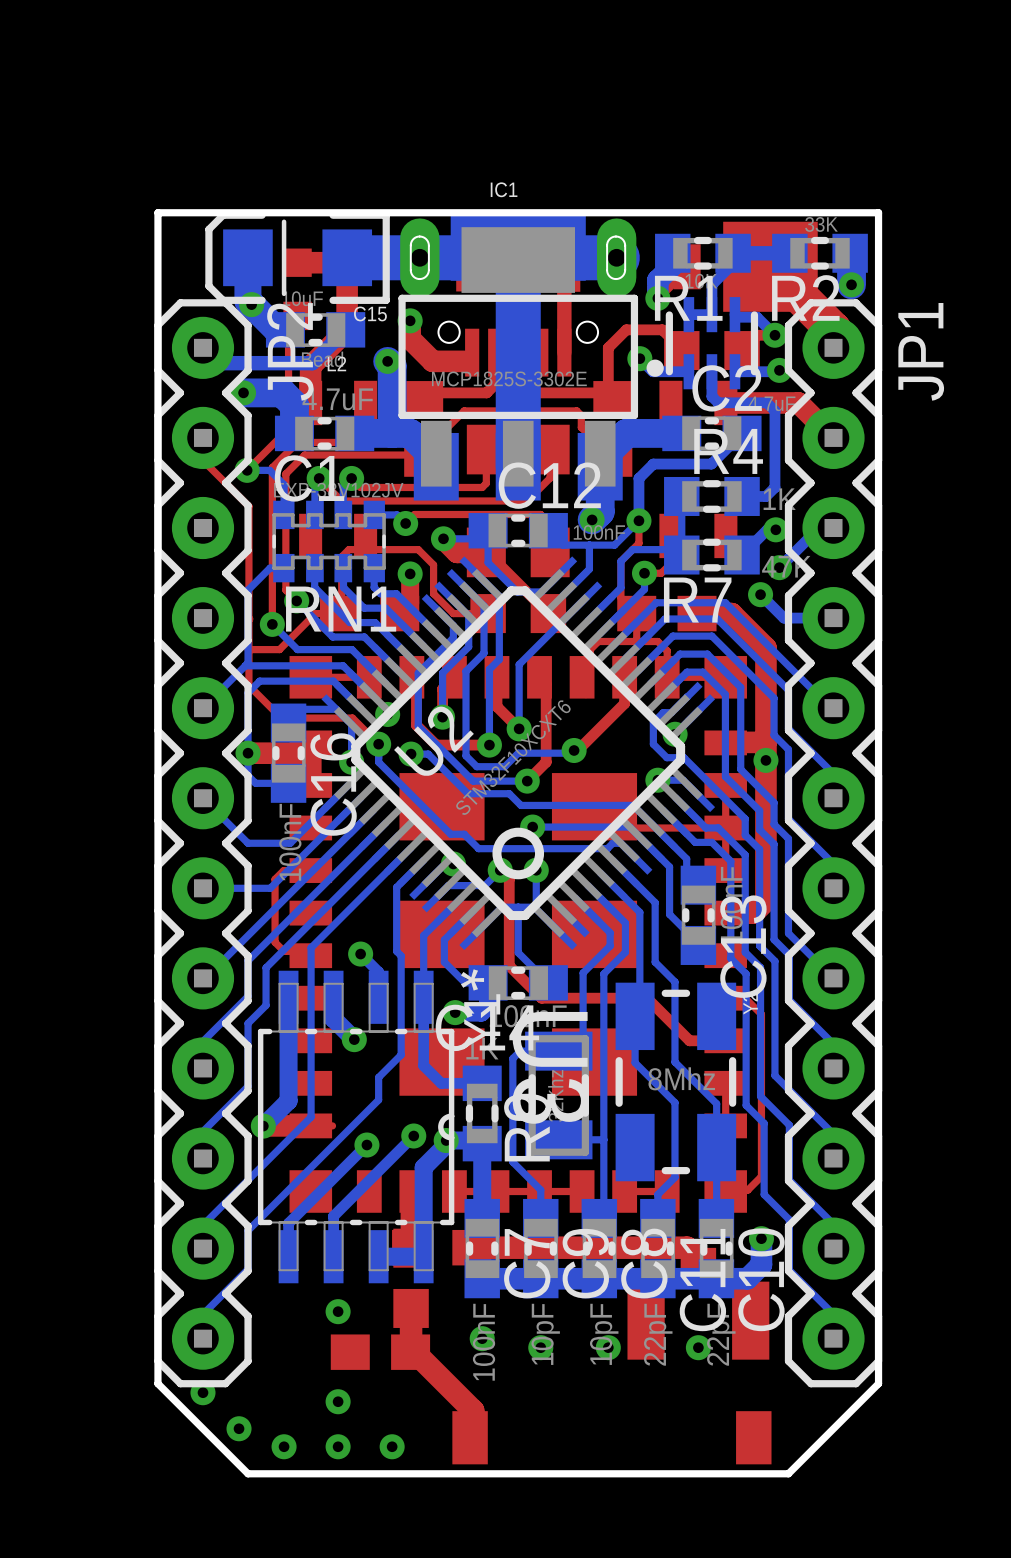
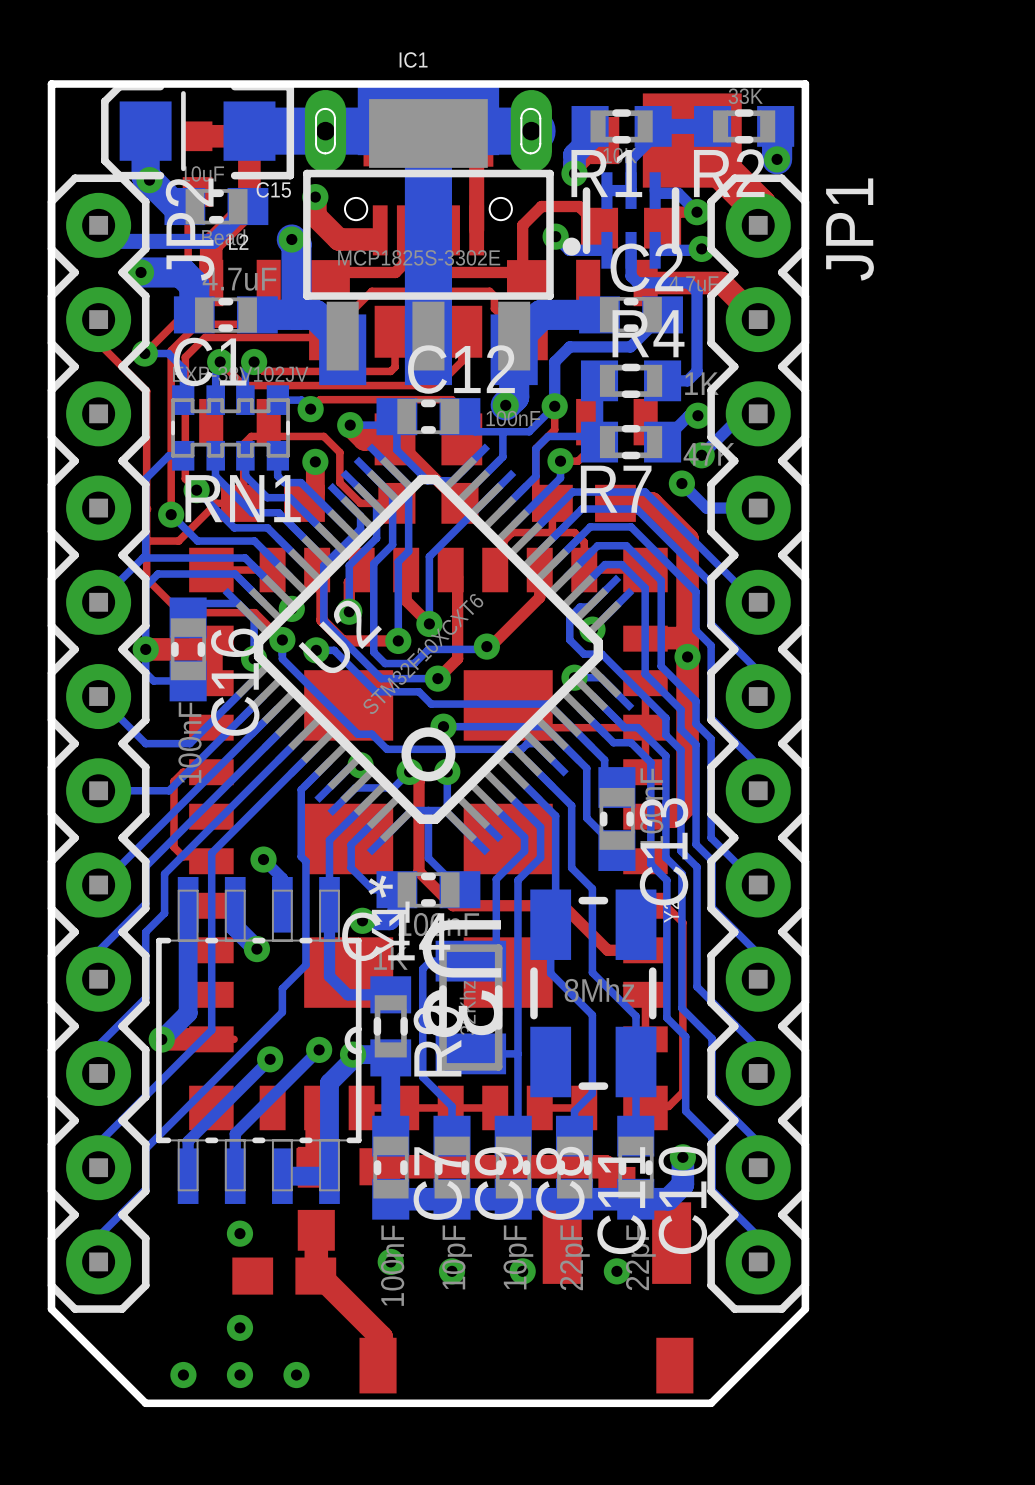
via: (202, 1392) -> none
via: (239, 1428) -> none

